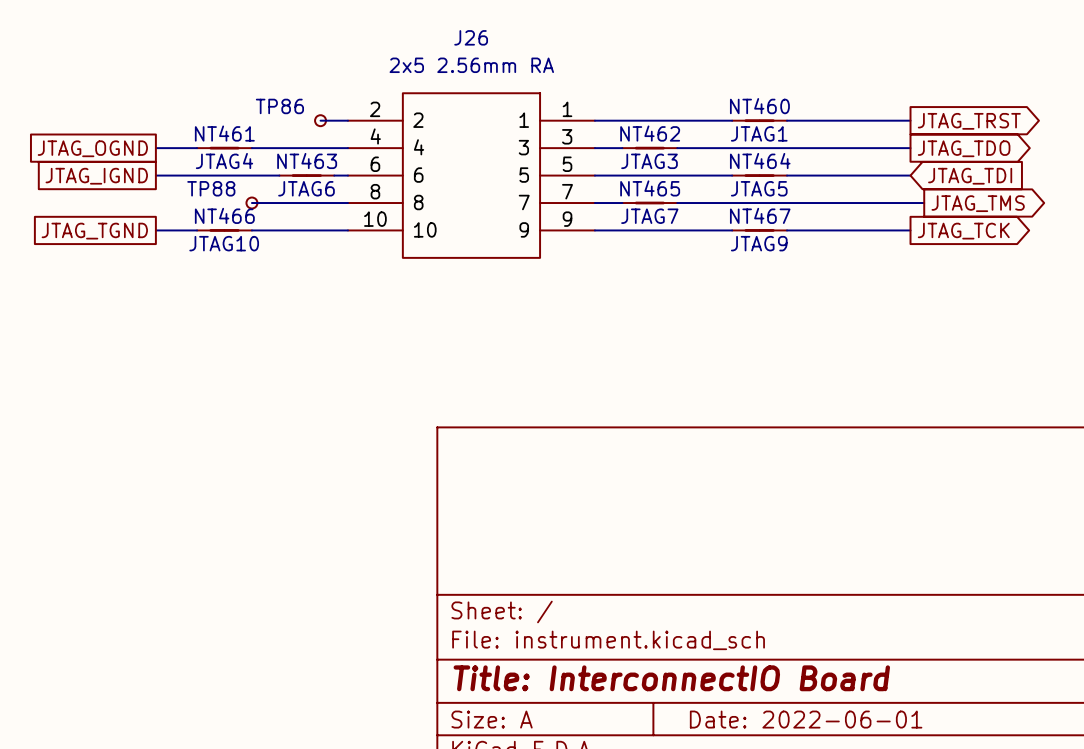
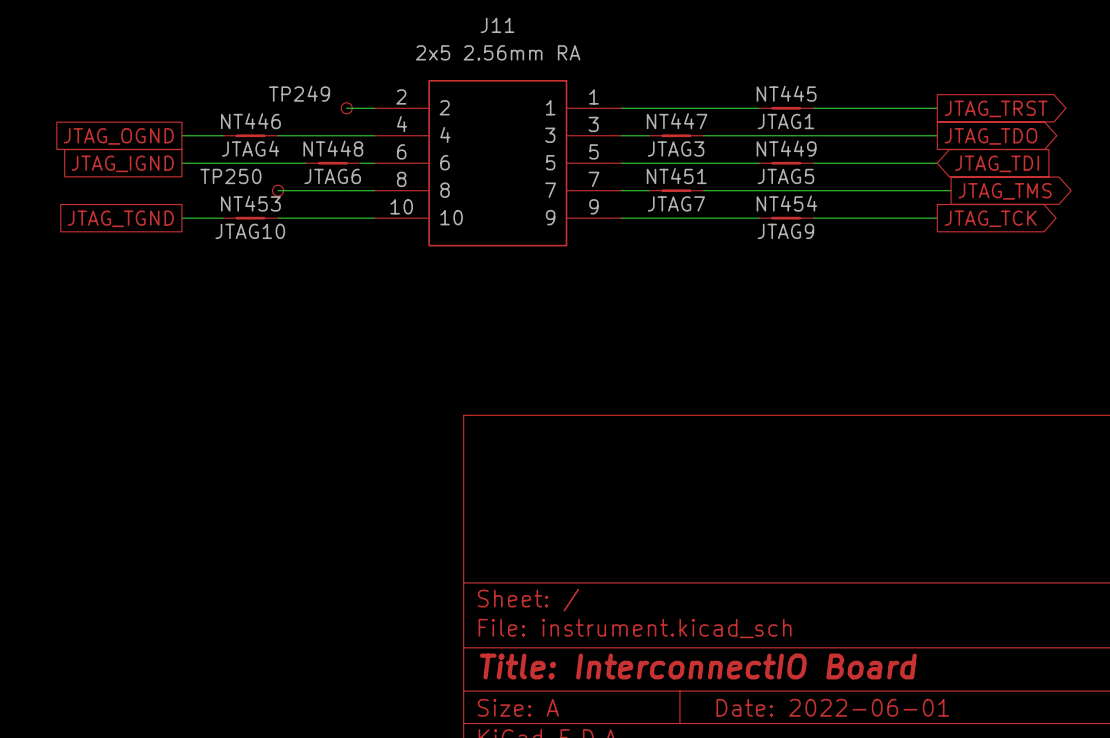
J26 name: J26 (471, 37) -> J11 (497, 25)
TP86 name: TP86 (279, 106) -> TP249 (299, 93)
NT460 name: NT460 (759, 106) -> NT445 (786, 93)
NT461 name: NT461 (224, 133) -> NT446 (250, 121)
NT462 name: NT462 (650, 133) -> NT447 (677, 121)
NT463 name: NT463 (307, 161) -> NT448 (333, 148)
NT464 name: NT464 (760, 161) -> NT449 (786, 148)
TP88 name: TP88 (211, 188) -> TP250 (230, 176)
NT465 name: NT465 (650, 188) -> NT451 (676, 176)
NT466 name: NT466 (224, 215) -> NT453 (250, 203)
NT467 name: NT467 (760, 215) -> NT454 (786, 203)

